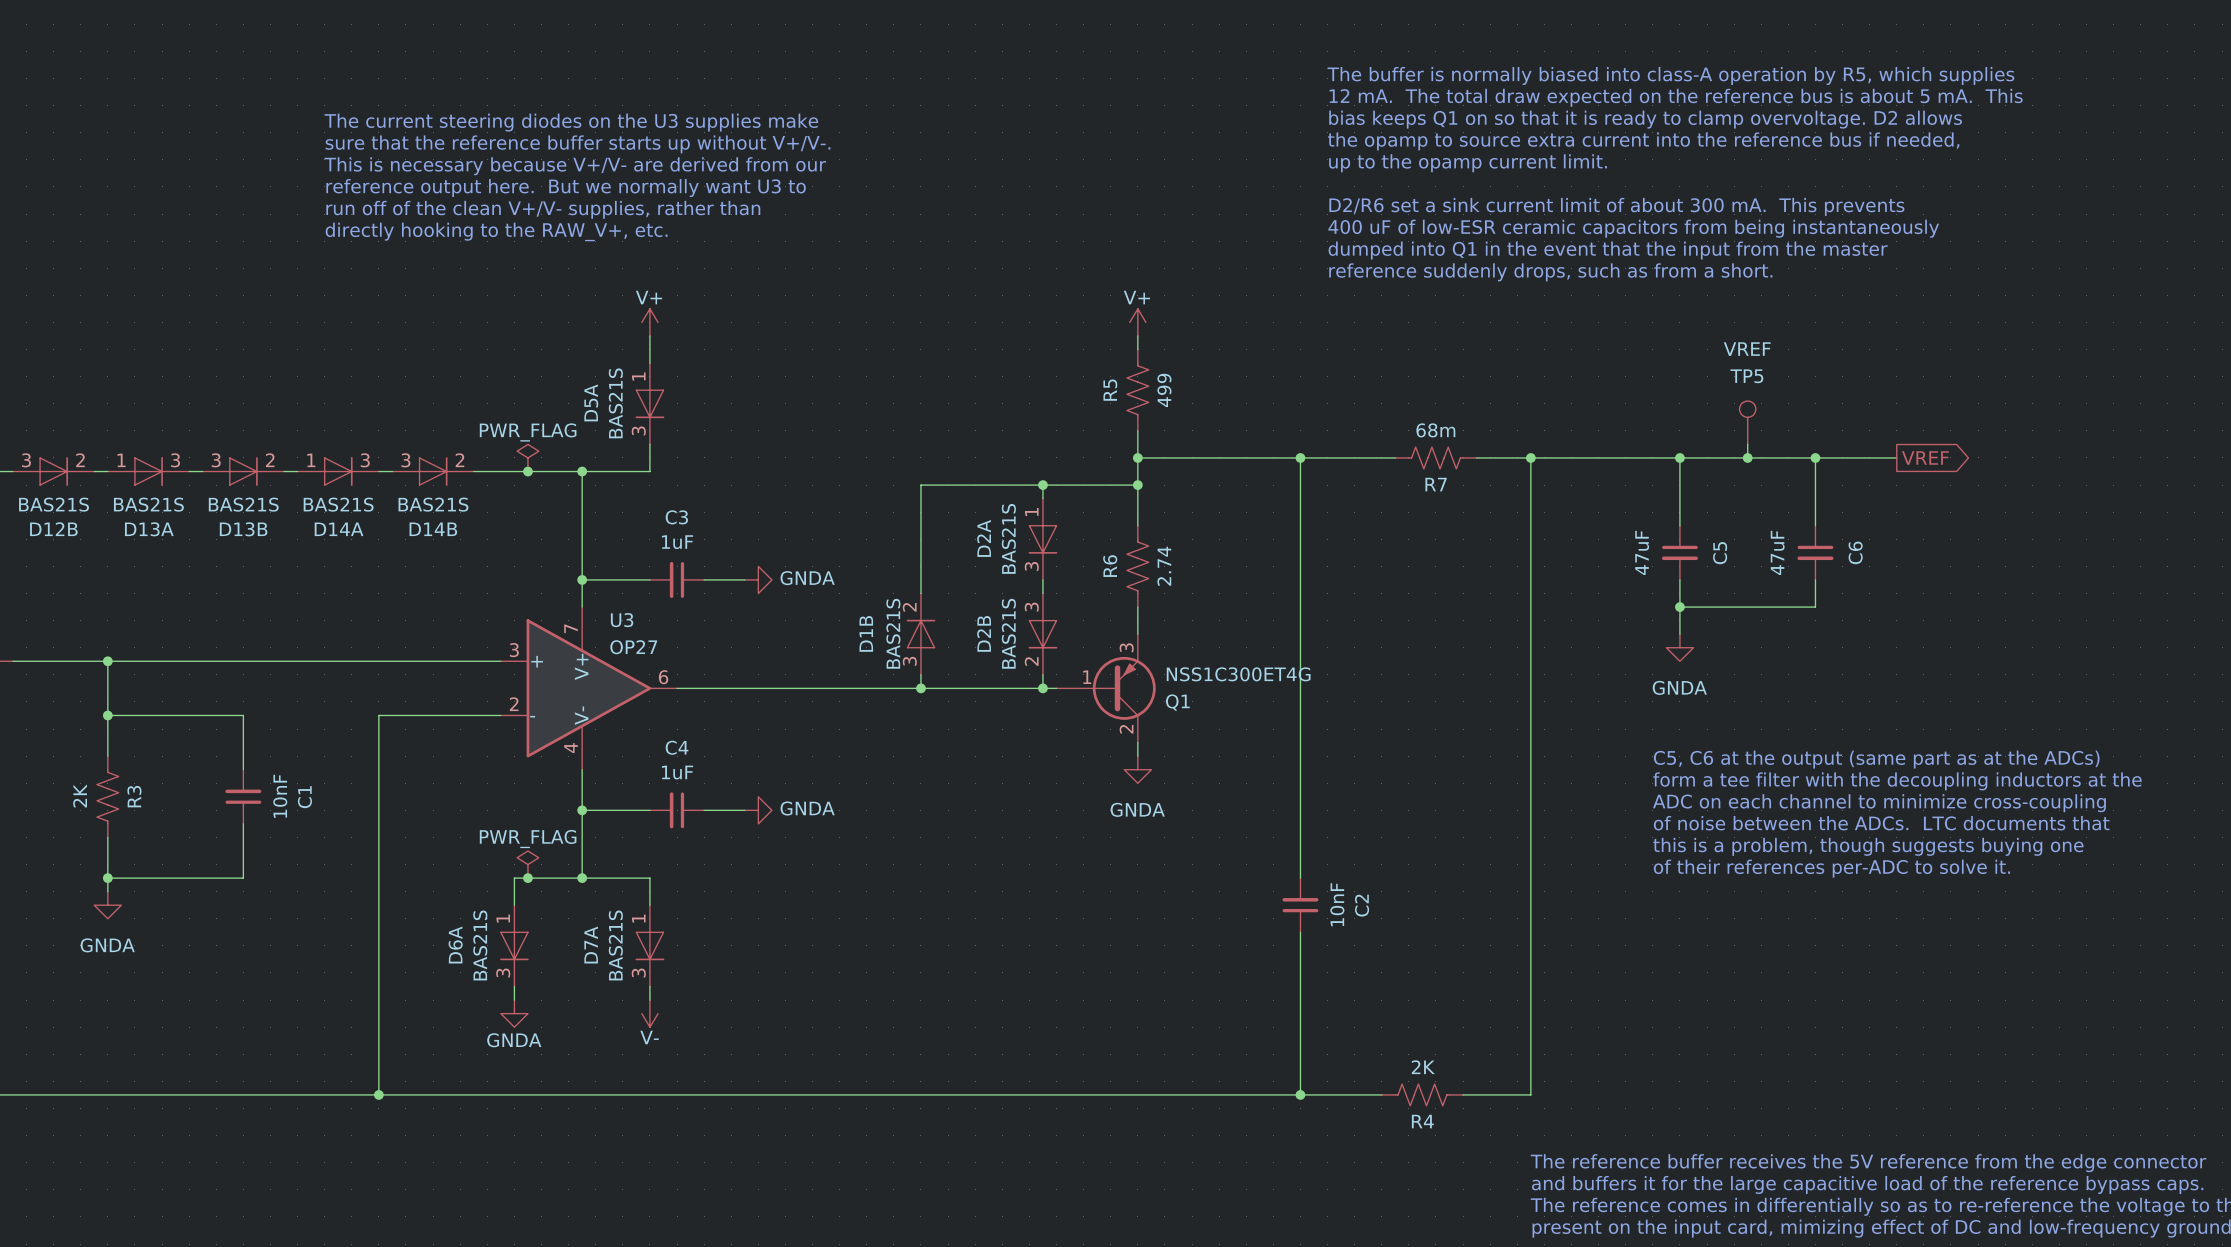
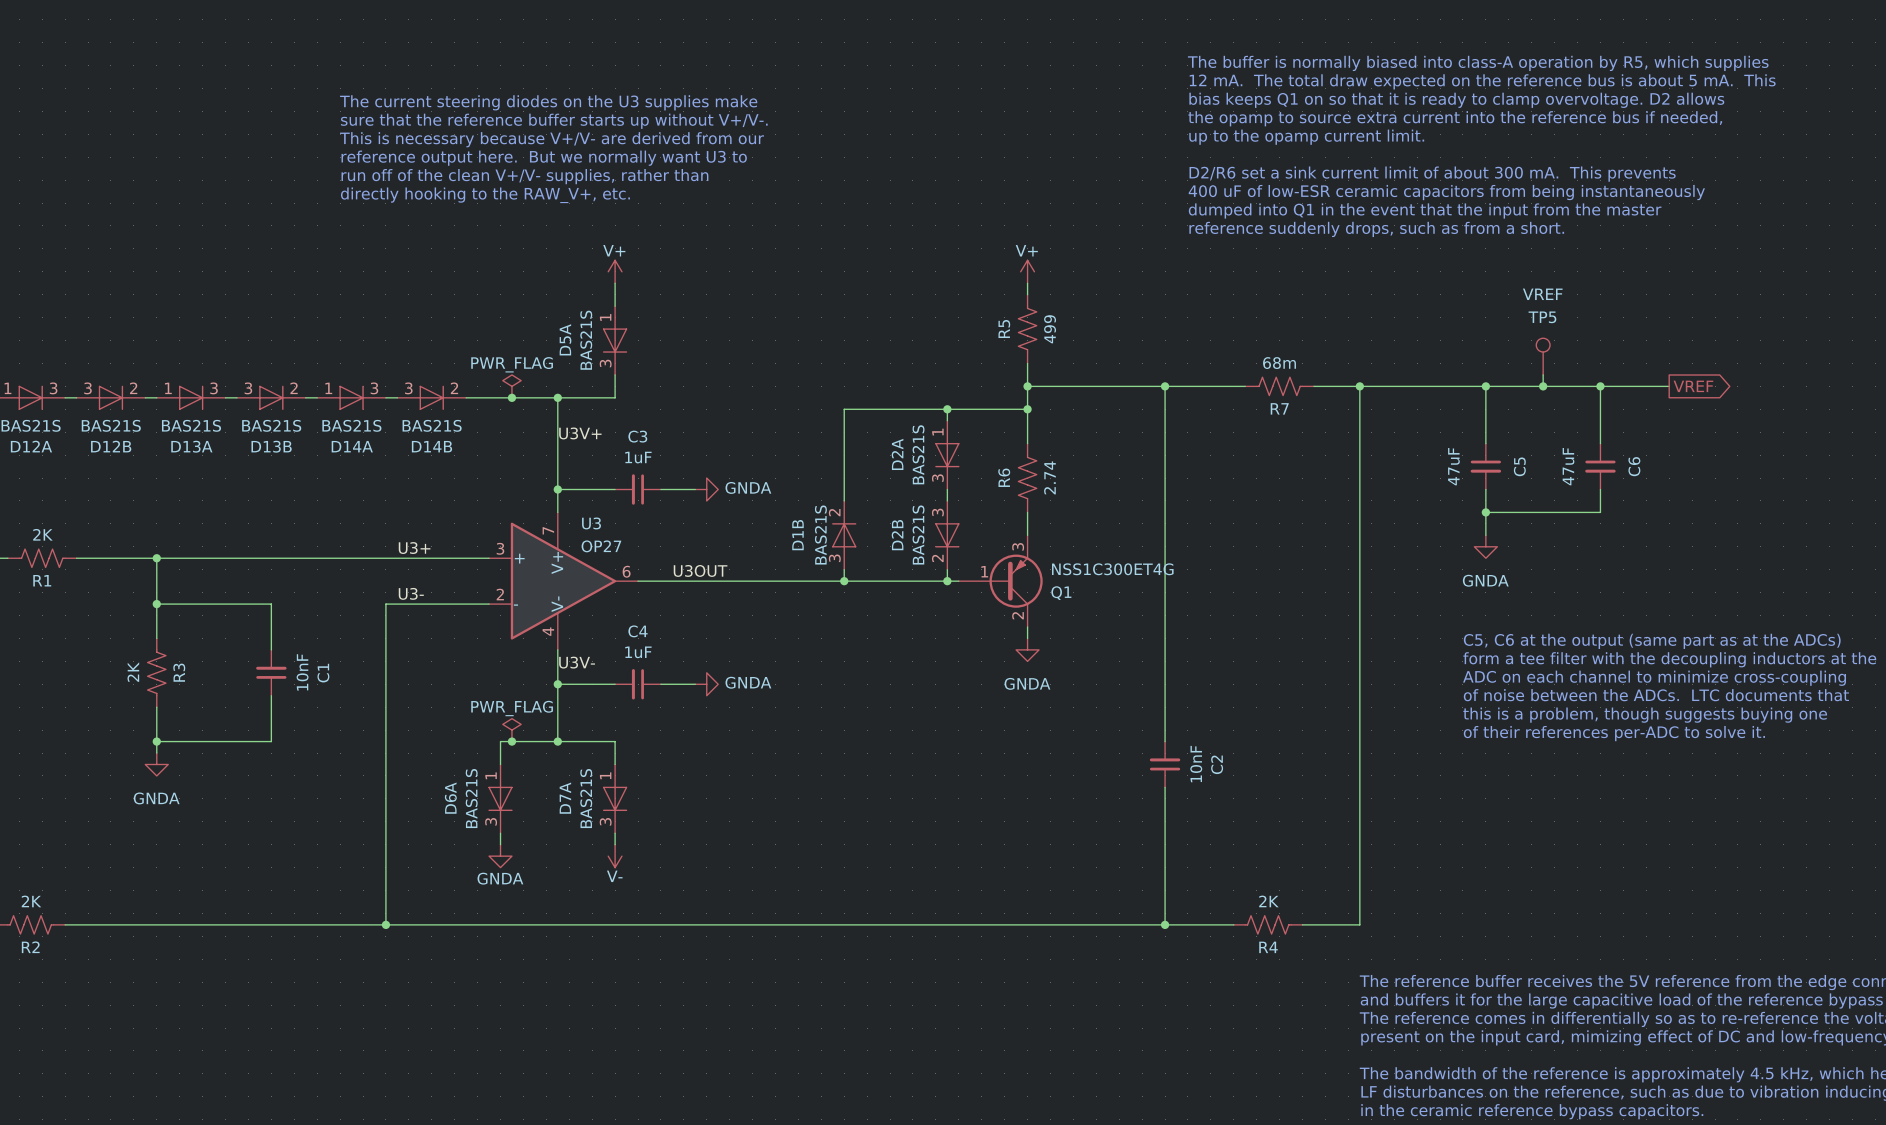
label: none -> U3V+ (580, 433)
label: none -> U3+ (414, 548)
label: none -> U3OUT (700, 570)
label: none -> U3- (411, 593)
label: none -> U3V- (577, 662)

